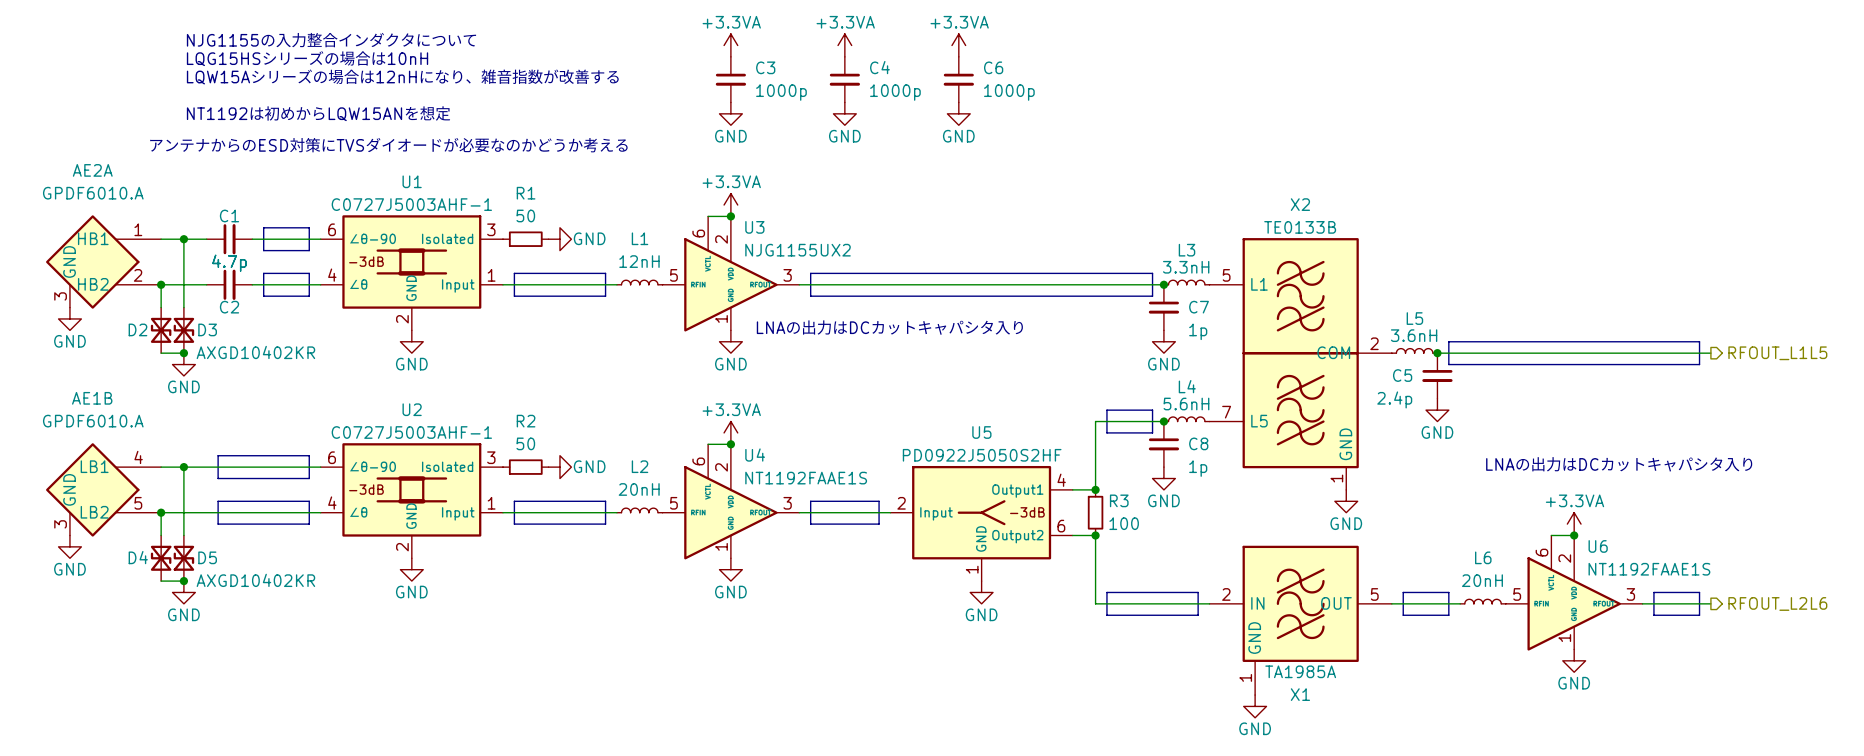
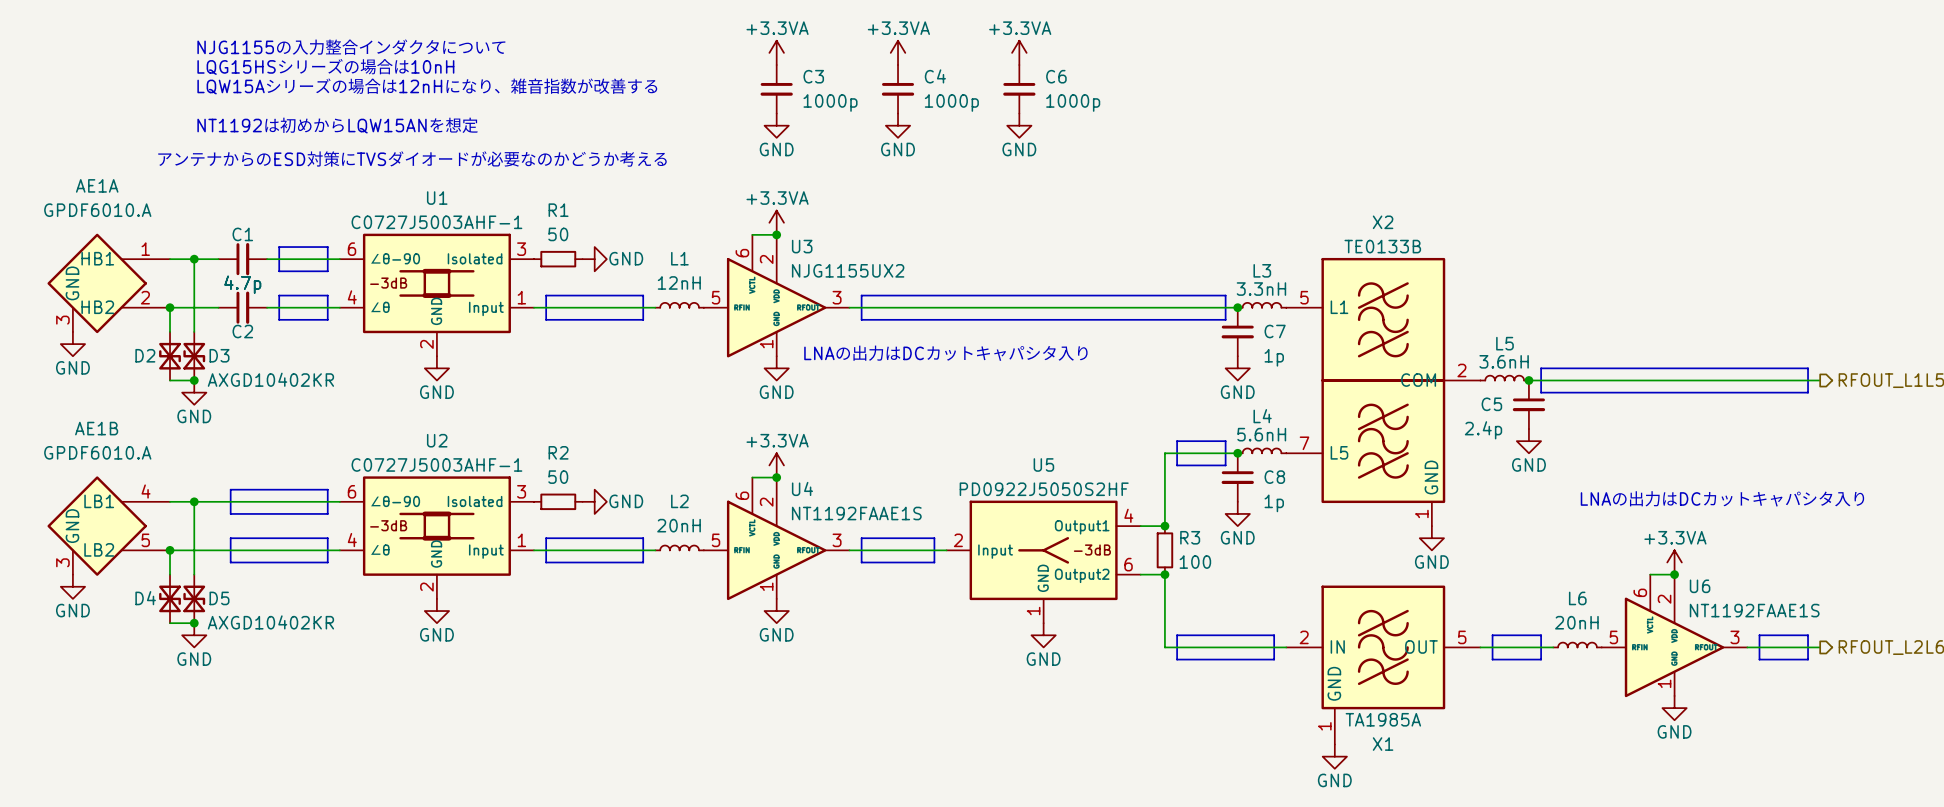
AE2A name: AE2A (92, 170) -> AE1A (97, 185)

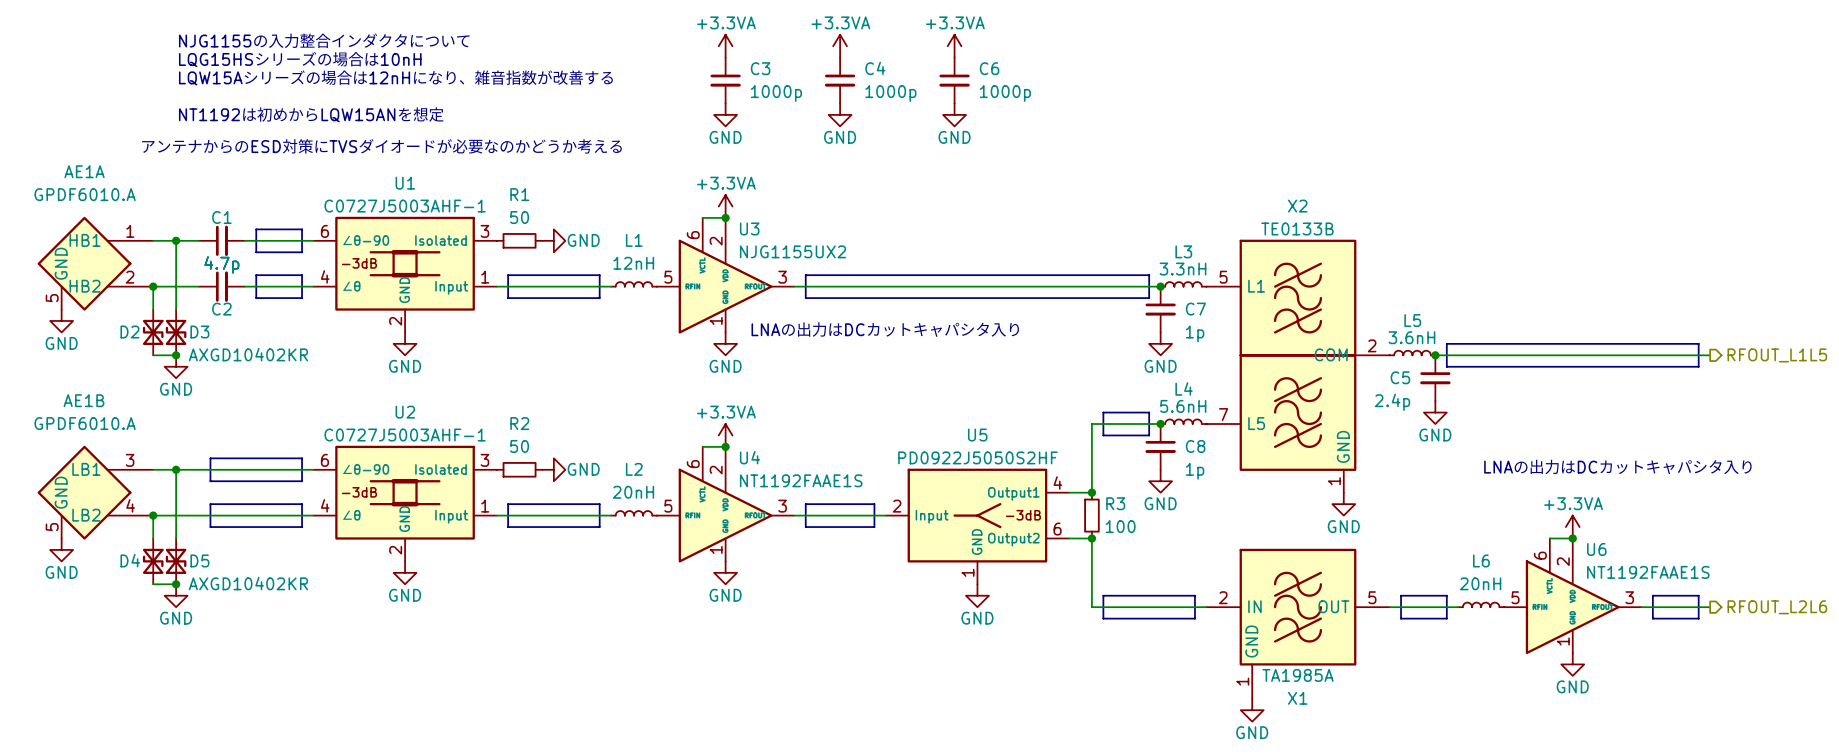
AE1A pin number: 3 (62, 320) -> 5 (52, 298)
AE1B pin number: 4 (146, 491) -> 3 (130, 460)
AE1B pin number: 5 (145, 540) -> 4 (130, 505)
AE1B pin number: 3 (62, 562) -> 5 (52, 527)

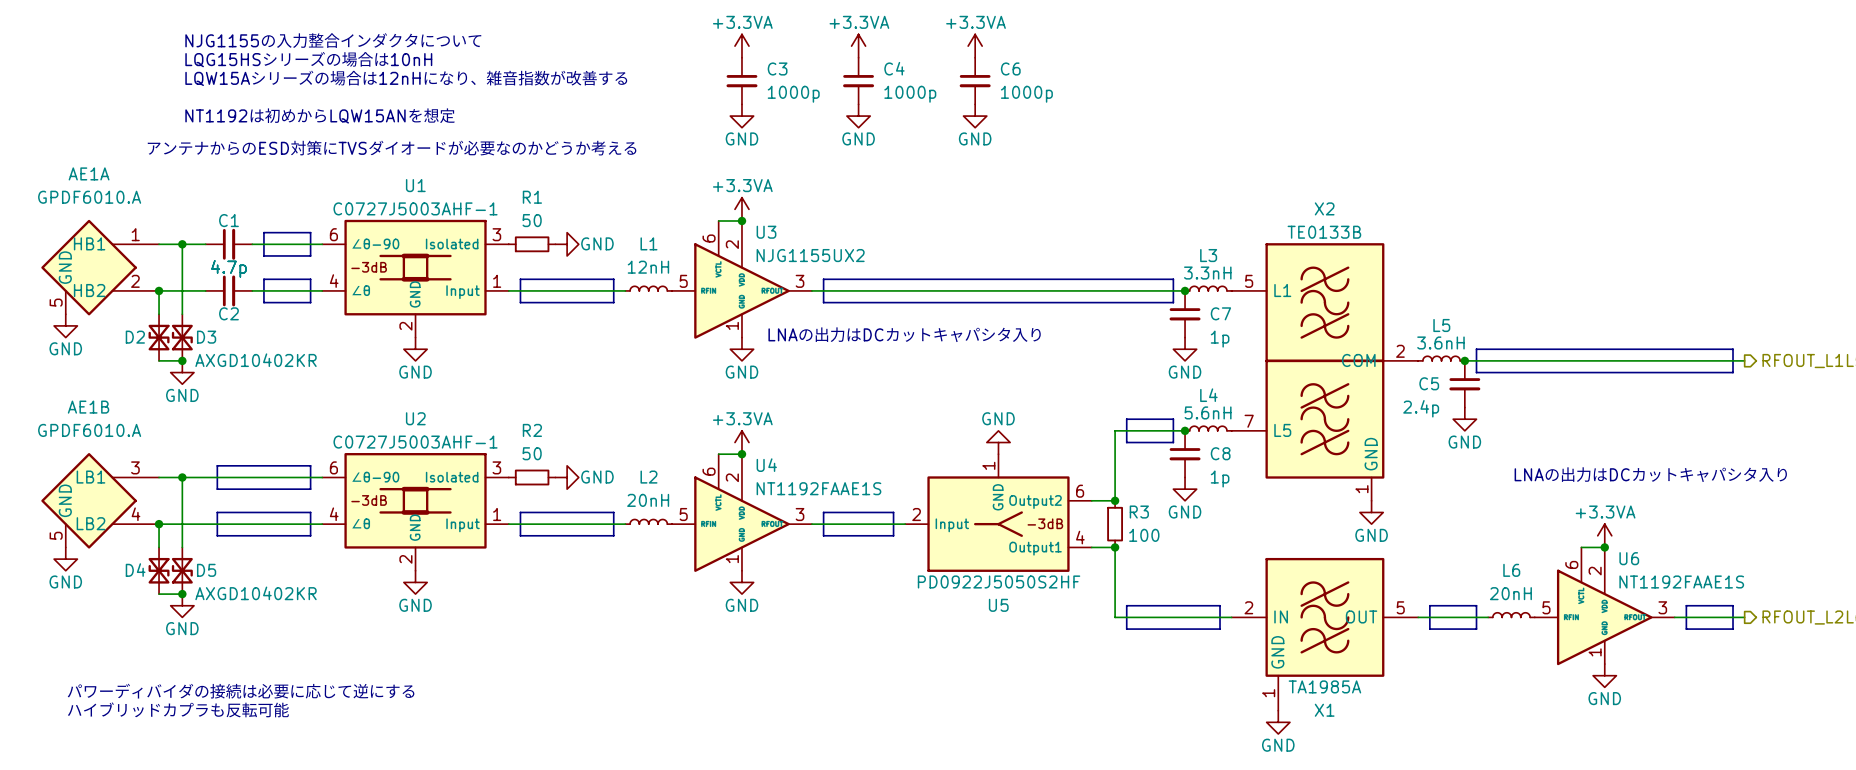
U5 flip: as is (977, 515) -> up-down (998, 524)
power symbol rotation: 0° (977, 595) -> 180° (998, 442)
power symbol position: GND (977, 595) -> GND (998, 442)
text: none -> パワーディバイダの接続は必要に応じて逆にする (241, 691)
text: none -> ハイブリッドカプラも反転可能 (178, 709)

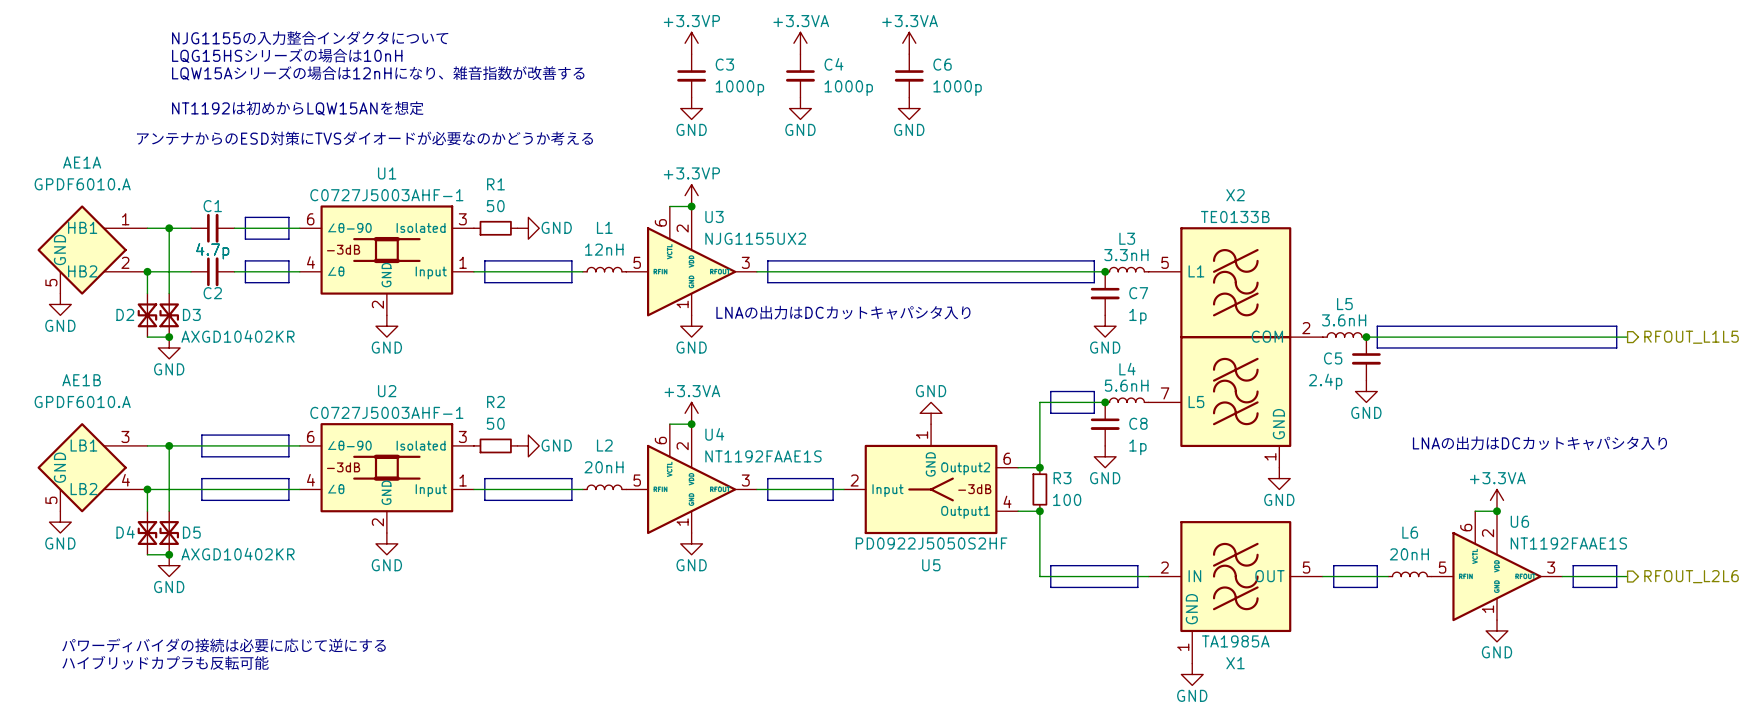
power symbol: +3.3VA (741, 46) -> +3.3VP (691, 43)
power symbol: +3.3VA (741, 209) -> +3.3VP (691, 195)

